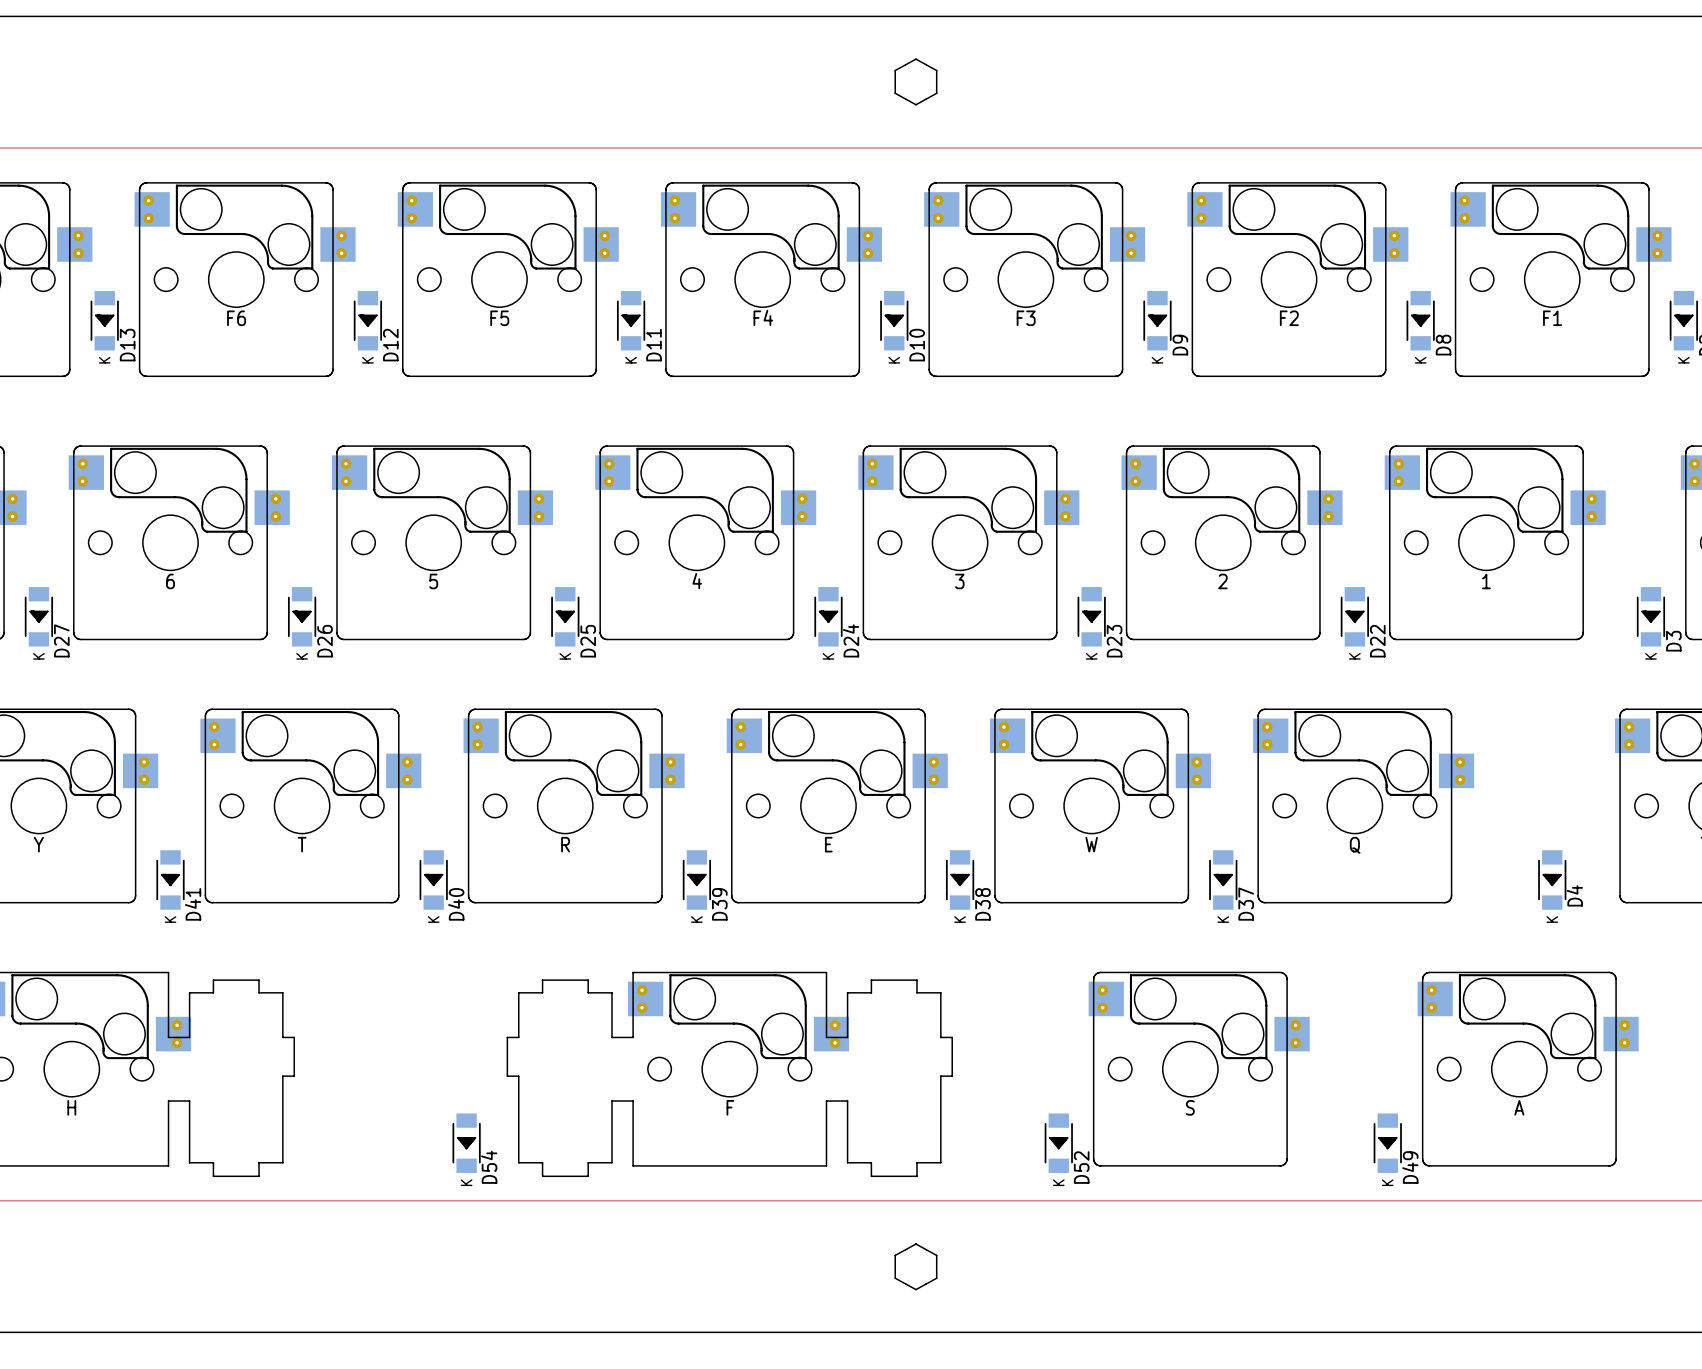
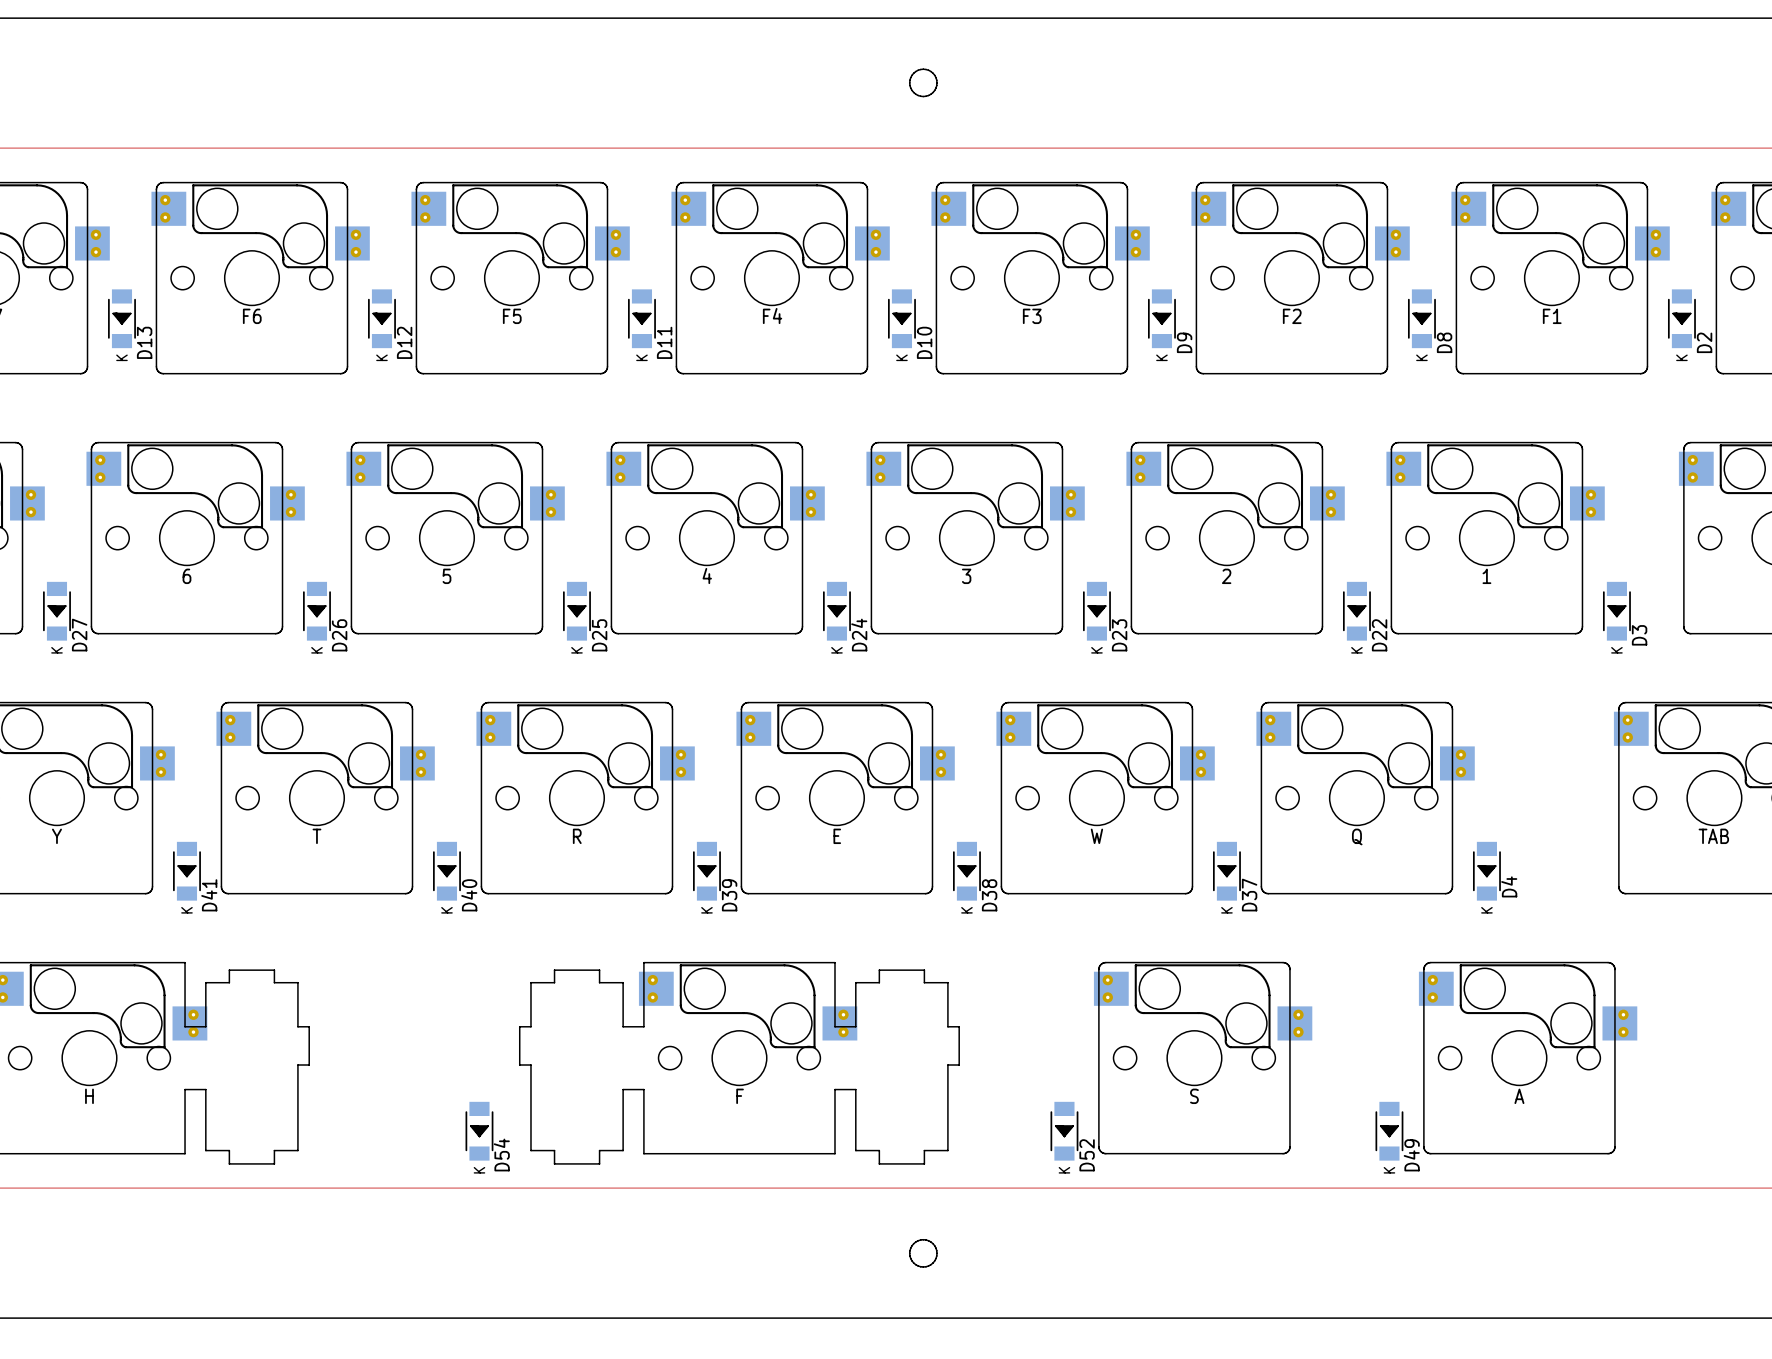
board edge: (915, 59) (895, 70) (895, 93) (915, 104) (936, 93) (936, 70) (915, 59) -> none
board edge: none -> (923, 69) (933, 73) (937, 82) (933, 92) (923, 96) (913, 92) (909, 82) (913, 73) (923, 69)
D3 position: (1650, 616) -> (1616, 611)
D4 position: (1552, 880) -> (1486, 871)
board edge: (915, 1244) (895, 1255) (895, 1278) (915, 1289) (936, 1278) (936, 1255) (915, 1244) -> none
board edge: none -> (923, 1239) (933, 1243) (937, 1253) (933, 1263) (923, 1267) (913, 1263) (909, 1253) (913, 1243) (923, 1239)

